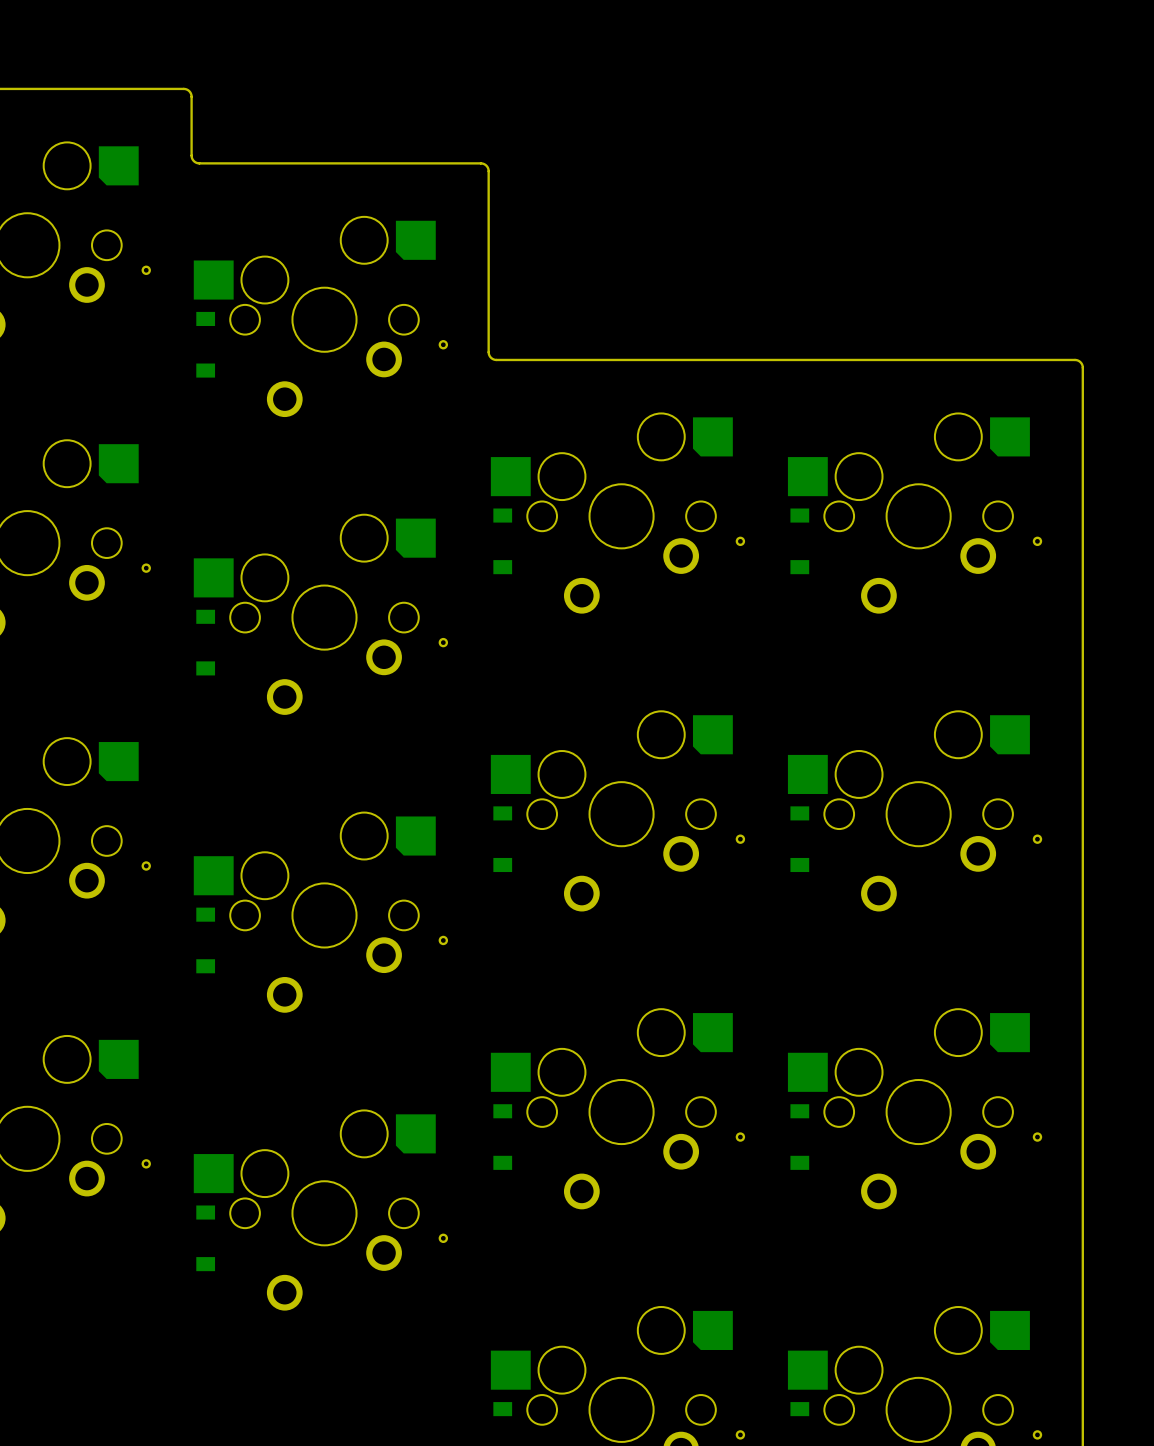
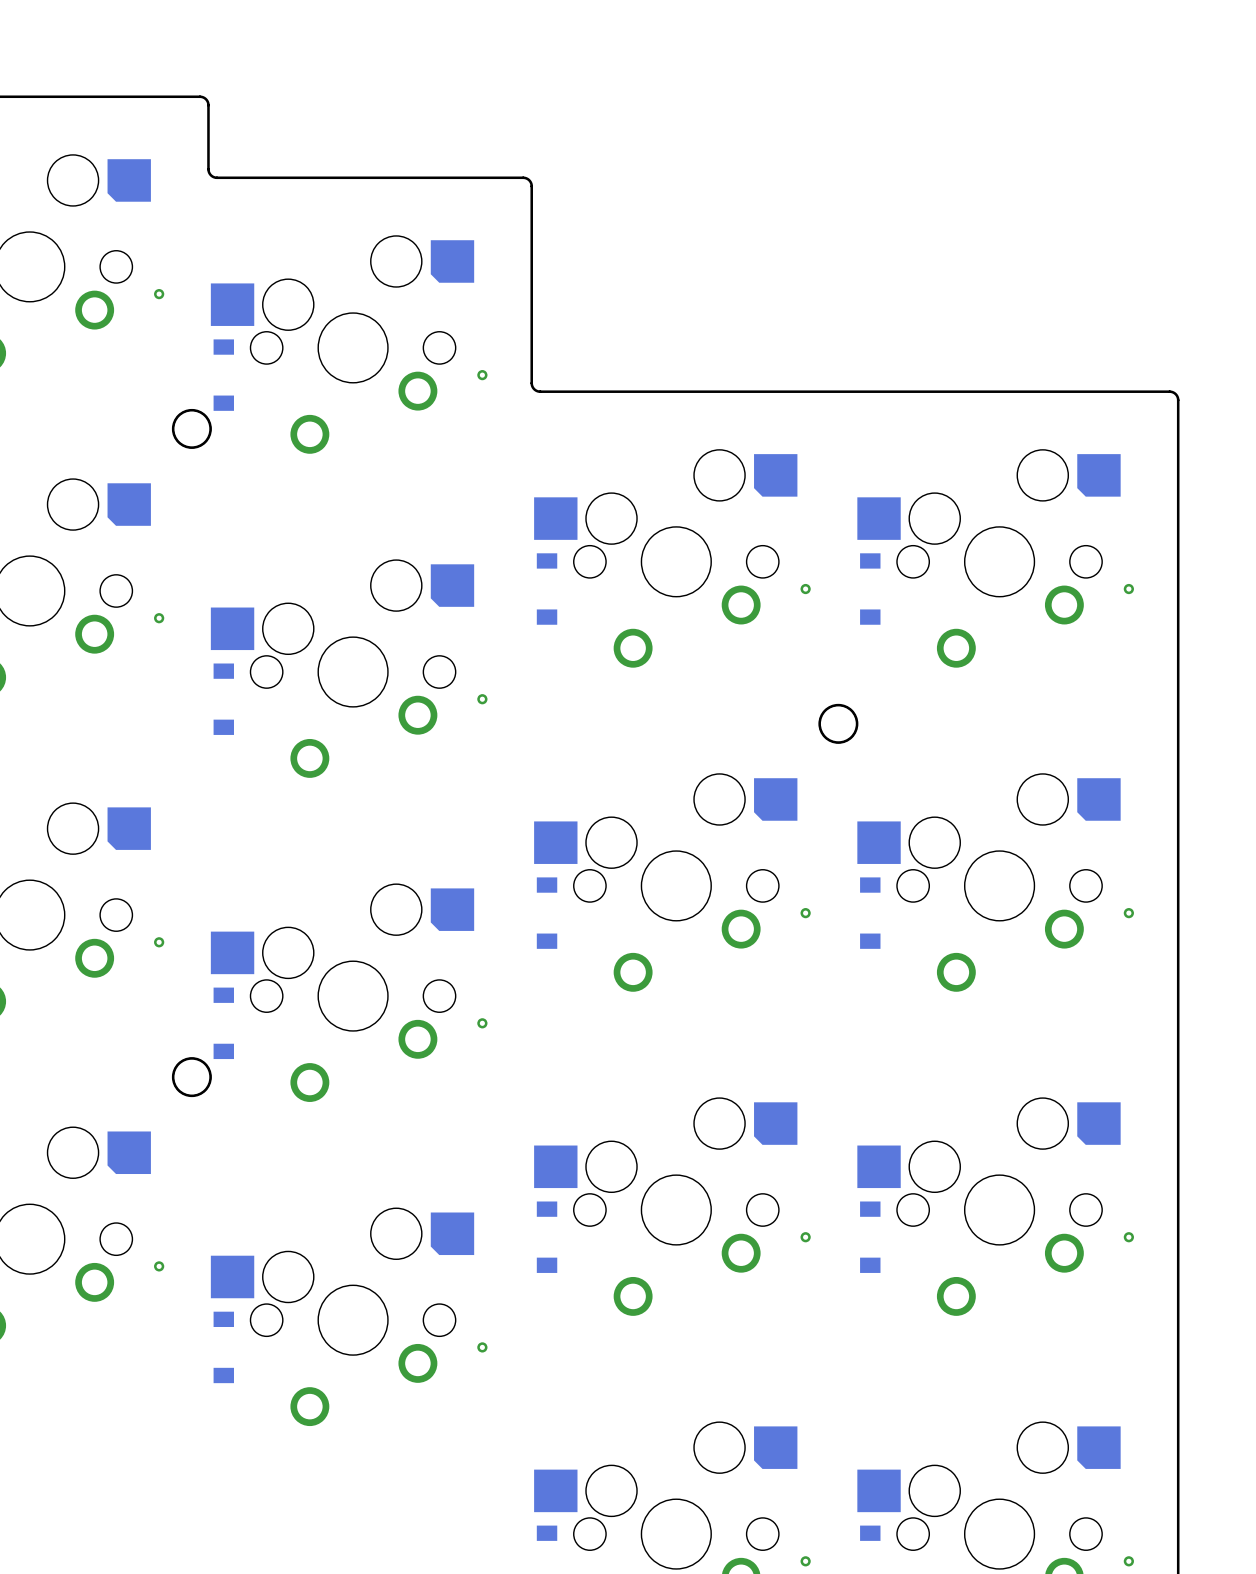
round board edge: none -> [171, 408, 212, 449]
round board edge: none -> [818, 703, 859, 744]
round board edge: none -> [171, 1057, 212, 1098]

